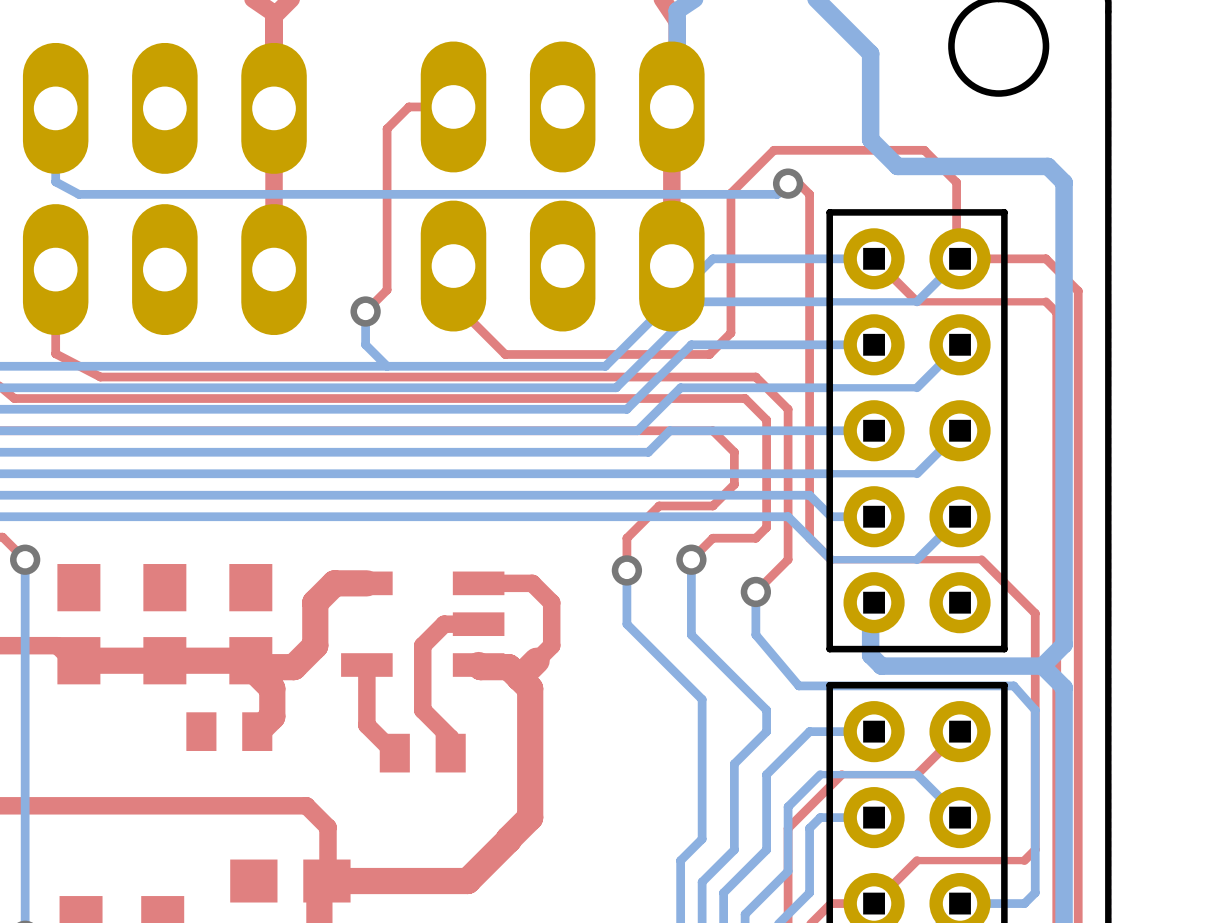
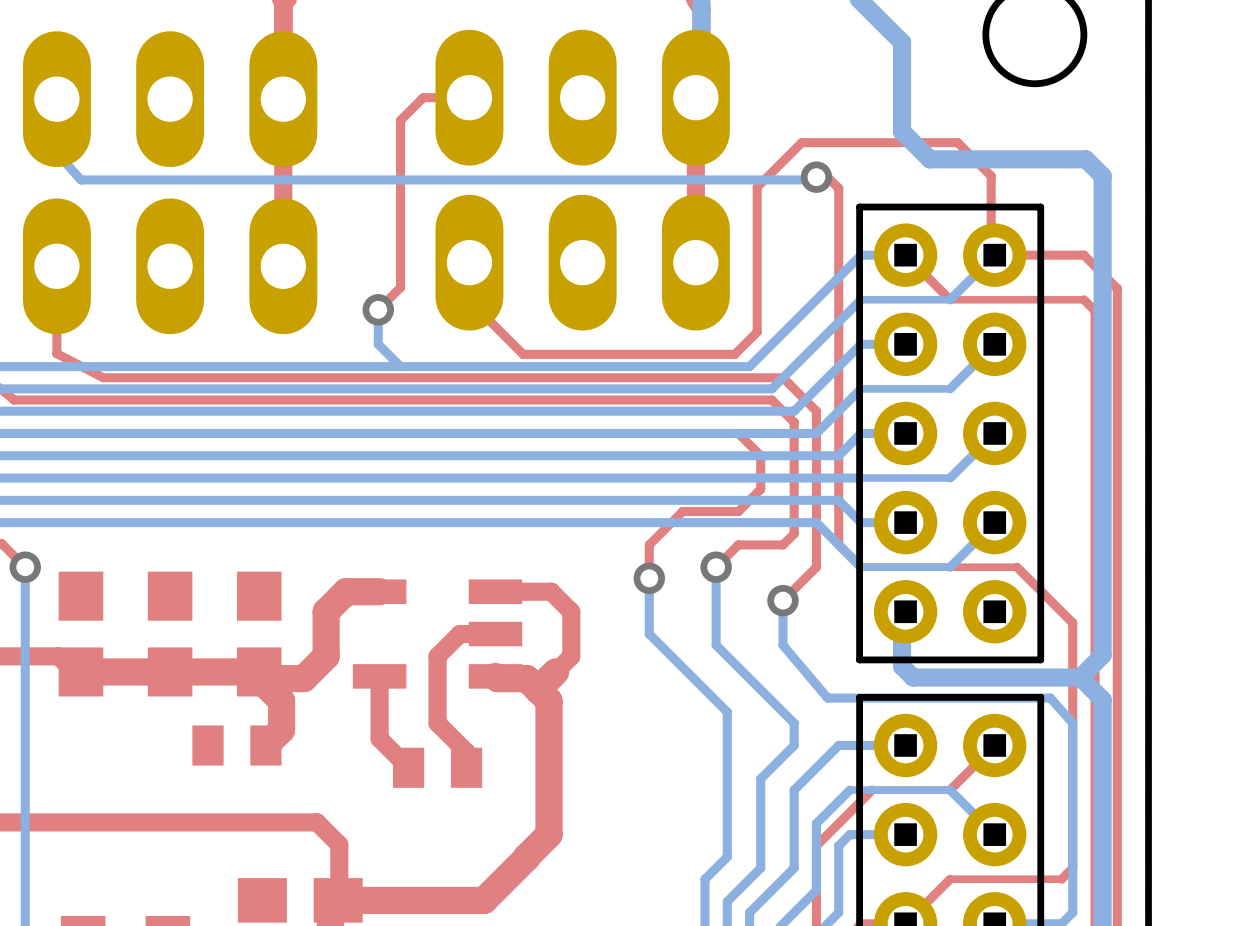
bottom track: (55, 160) (55, 181) (78, 194) (777, 194) (788, 183) -> (56, 153) (80, 179) (816, 179)
bottom track: (831, 258) (712, 258) (605, 366) -> (861, 255) (749, 366) (627, 366)
bottom track: (831, 301) (702, 301) (616, 387) -> none
bottom track: (831, 344) (691, 344) (626, 409) -> (861, 344) (794, 411) (649, 411)
bottom track: (680, 387) (637, 430) -> (705, 388) (638, 388)
bottom track: (831, 387) (745, 387) -> (861, 299) (771, 388)
bottom track: (669, 430) (648, 452) -> (693, 433) (660, 433)
bottom track: (831, 430) (788, 430) -> (861, 388) (816, 433)
bottom track: none -> (861, 433) (838, 455) (671, 455)

